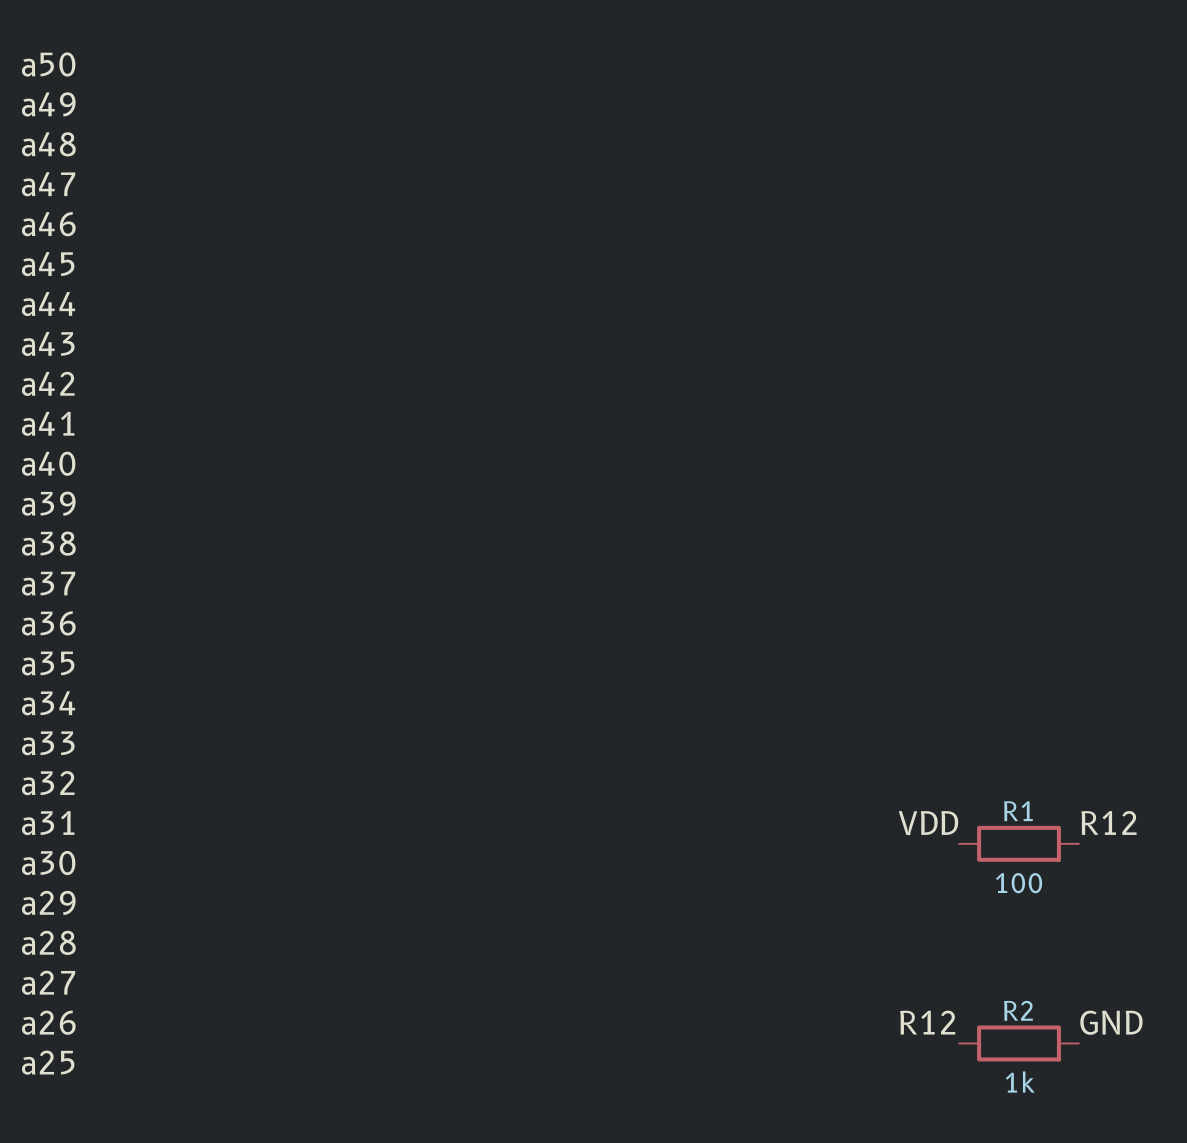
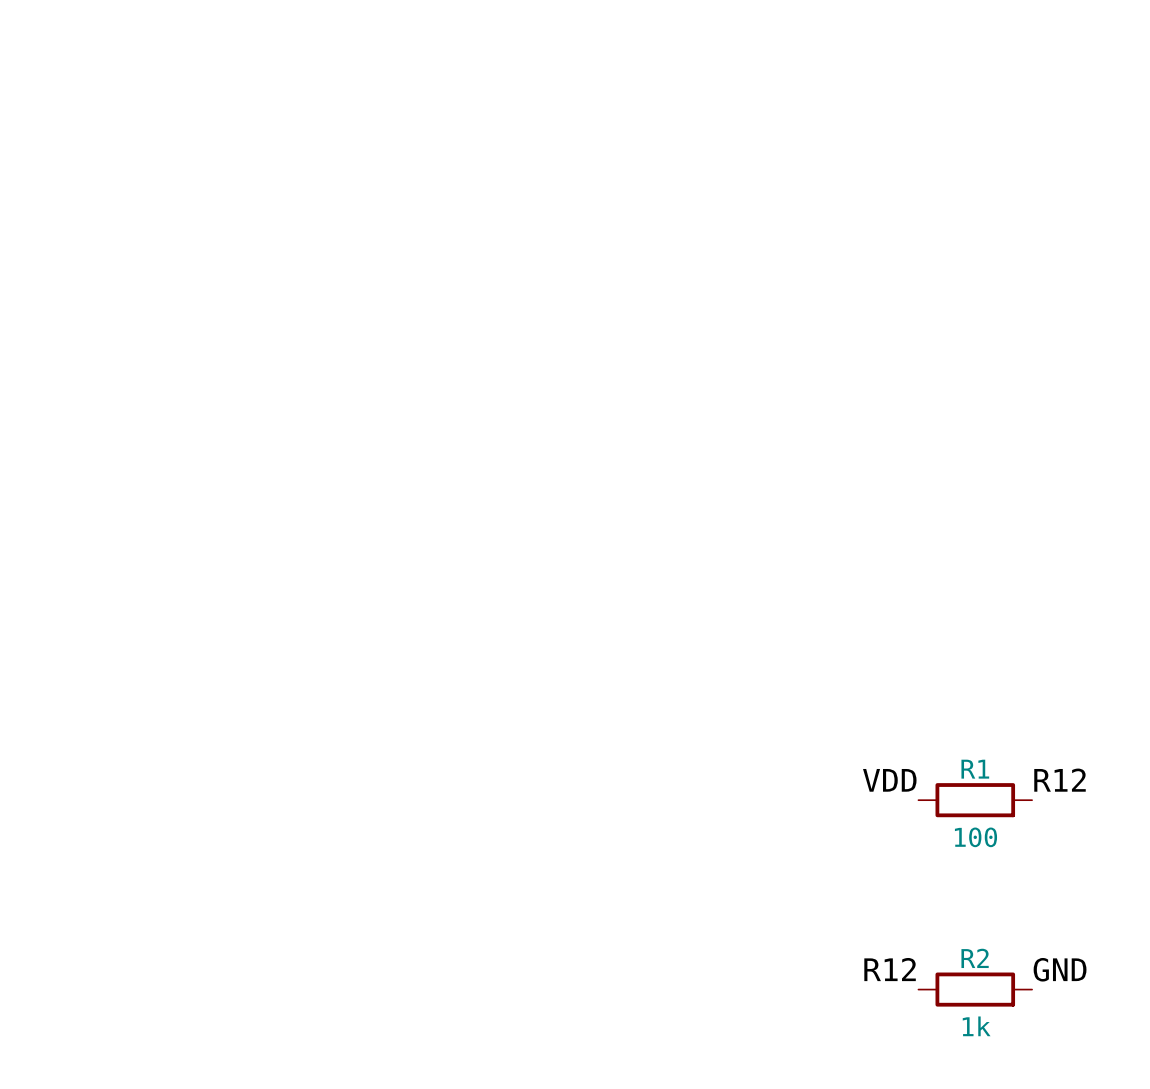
label: a50 (48, 64) -> none
label: a49 (48, 104) -> none
label: a48 (48, 144) -> none
label: a47 (48, 184) -> none
label: a46 (48, 224) -> none
label: a45 (48, 264) -> none
label: a44 (48, 304) -> none
label: a43 (48, 343) -> none
label: a42 (48, 383) -> none
label: a41 (48, 423) -> none
label: a40 (48, 463) -> none
label: a39 (48, 503) -> none
label: a38 (48, 543) -> none
label: a37 (48, 583) -> none
label: a36 (48, 623) -> none
label: a35 (48, 663) -> none
label: a34 (48, 703) -> none
label: a33 (48, 743) -> none
label: a32 (48, 783) -> none
label: a31 (48, 823) -> none
label: a30 (48, 863) -> none
label: a29 (48, 902) -> none
label: a28 (48, 942) -> none
label: a27 (48, 982) -> none
label: a26 (48, 1022) -> none
label: a25 (48, 1062) -> none

